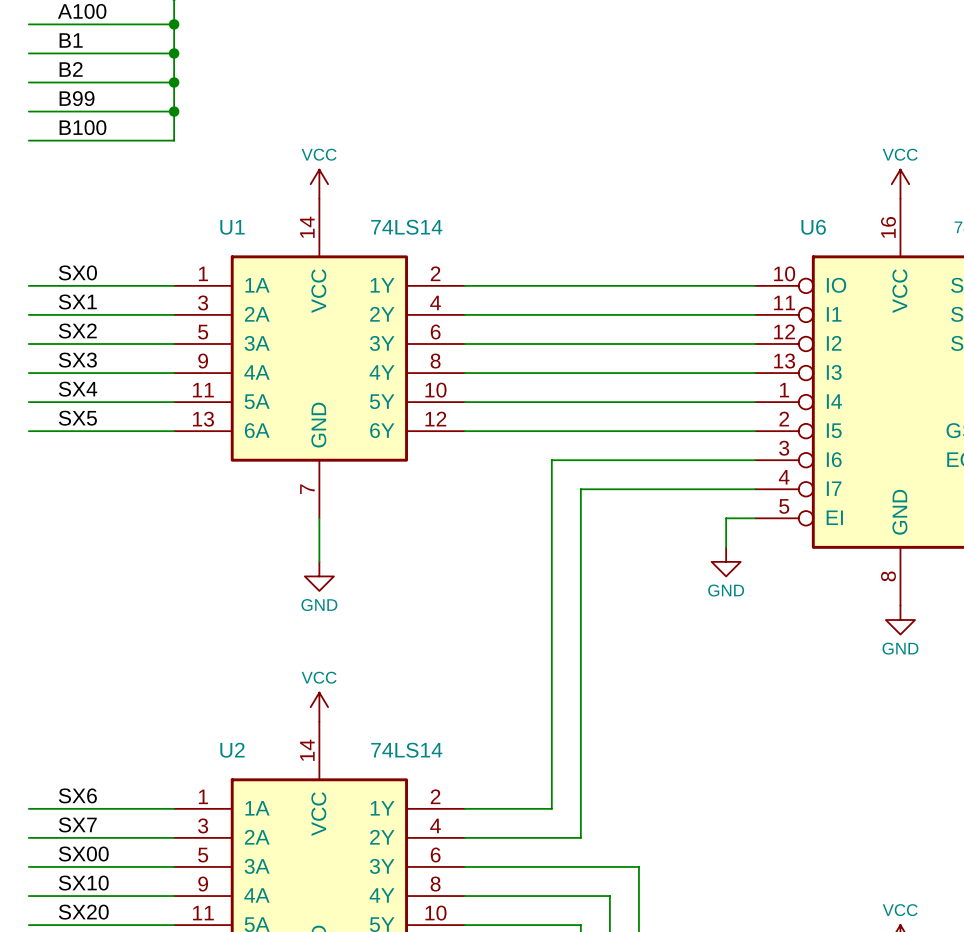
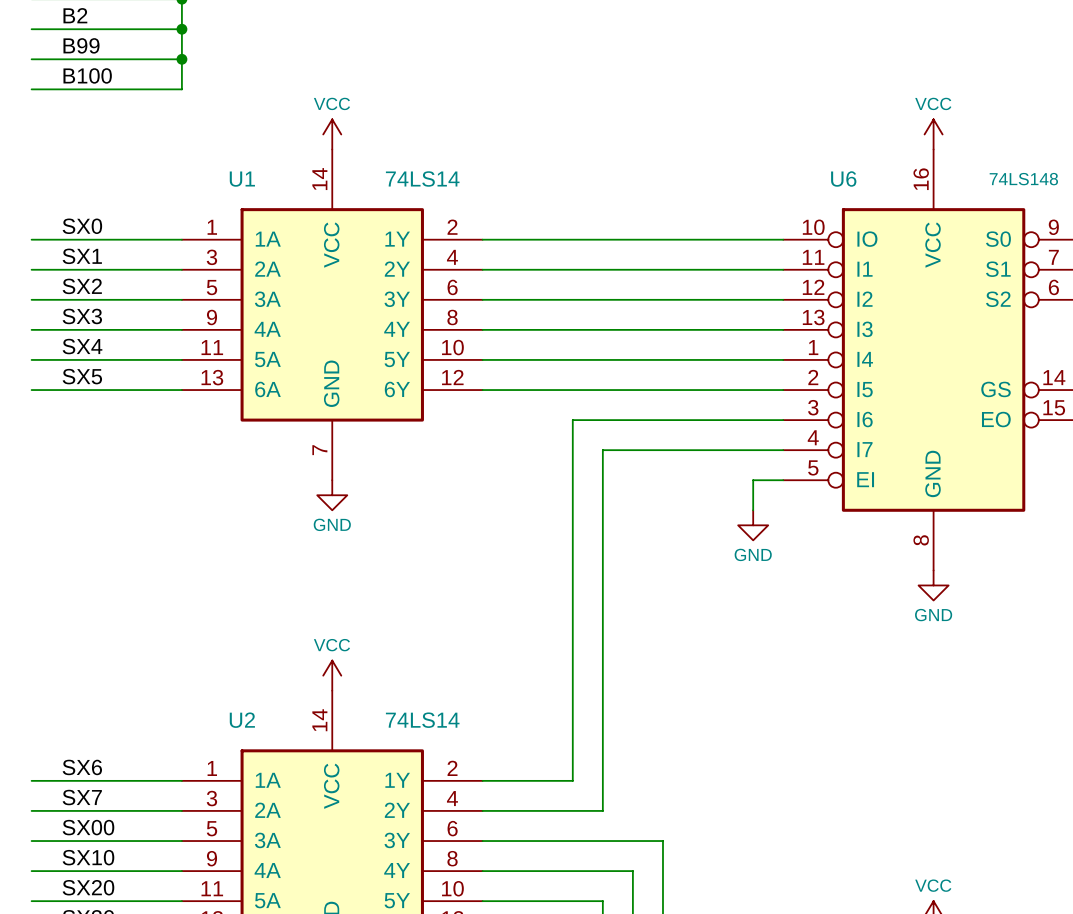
wire: (319, 518) (319, 561) -> none
power symbol position: GND (319, 576) -> GND (332, 495)

